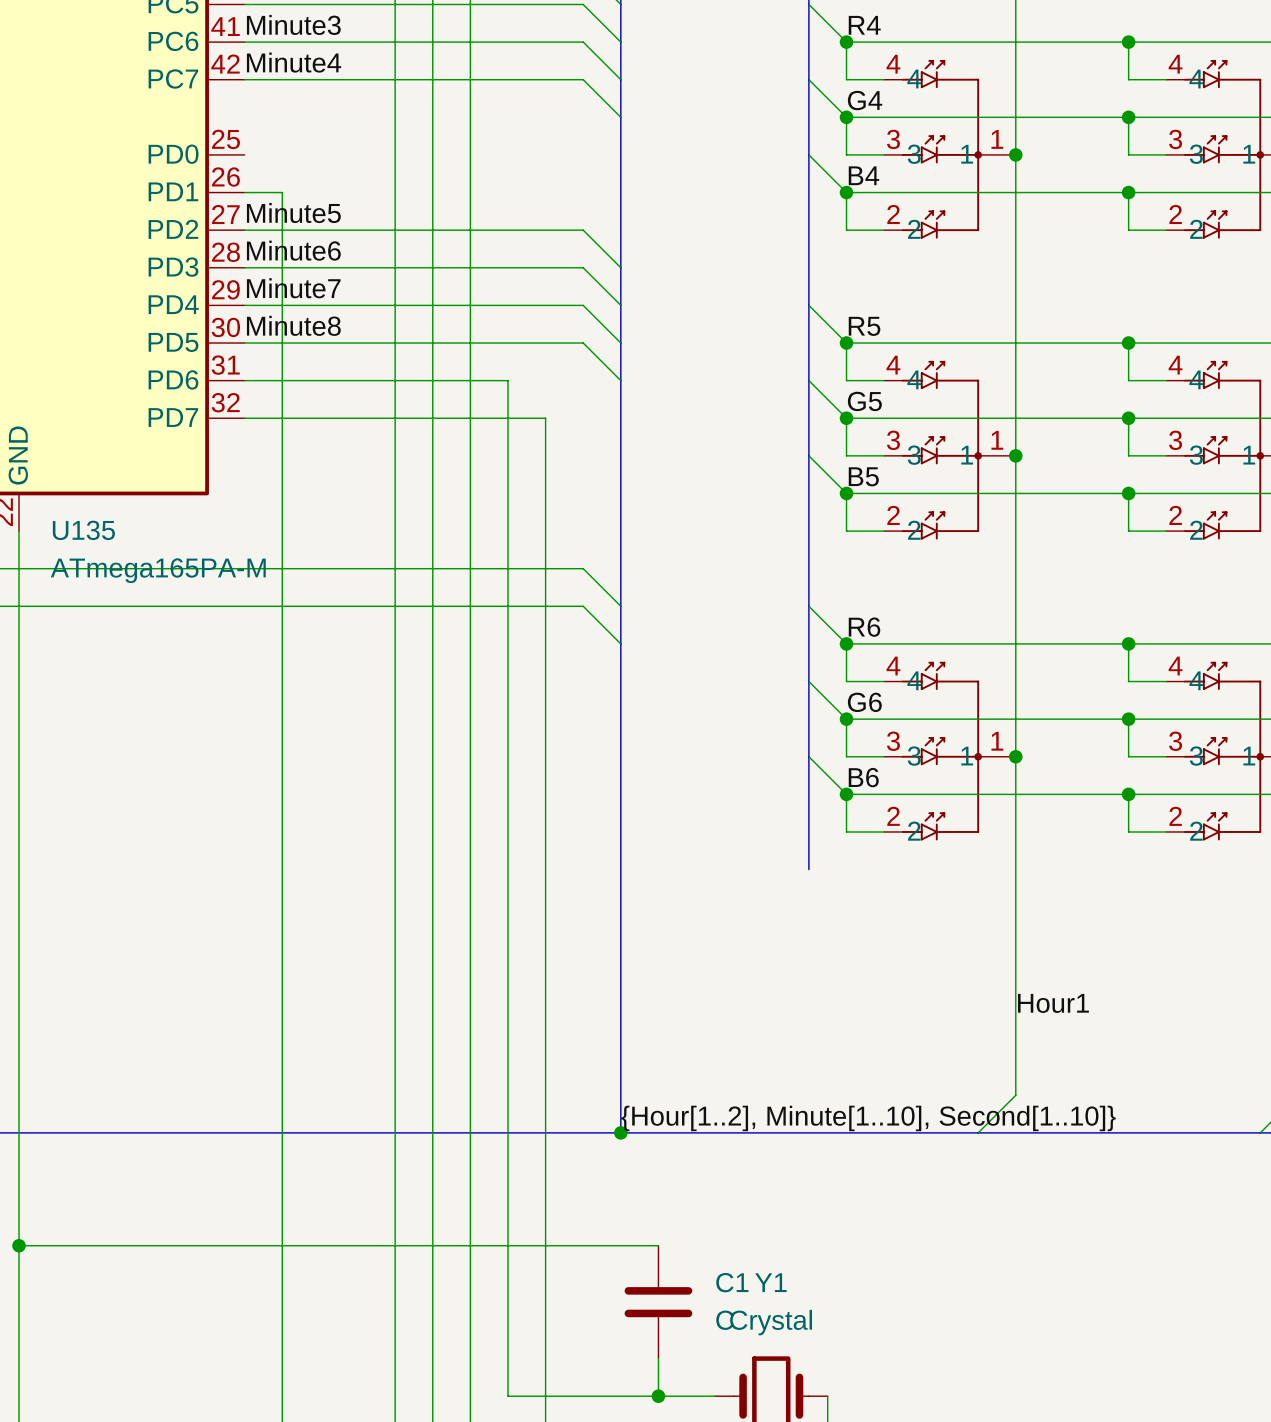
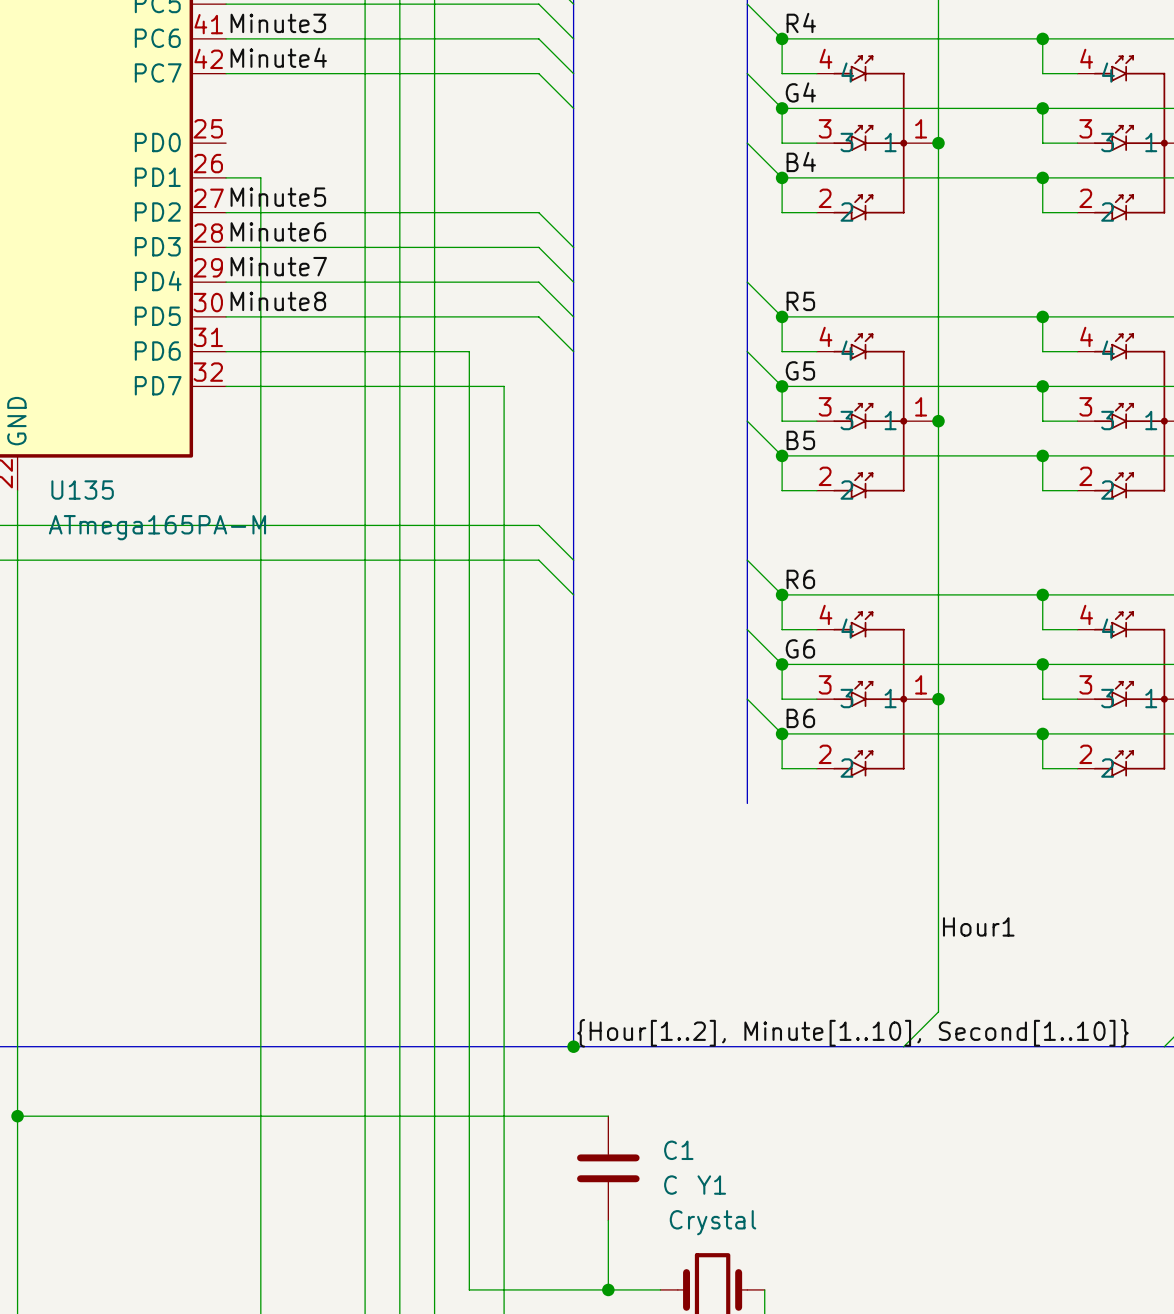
wire: (19, 1245) (658, 1245) -> (17, 1116) (608, 1116)
junction position: (19, 1245) -> (17, 1116)
C1 position: (658, 1302) -> (608, 1168)

